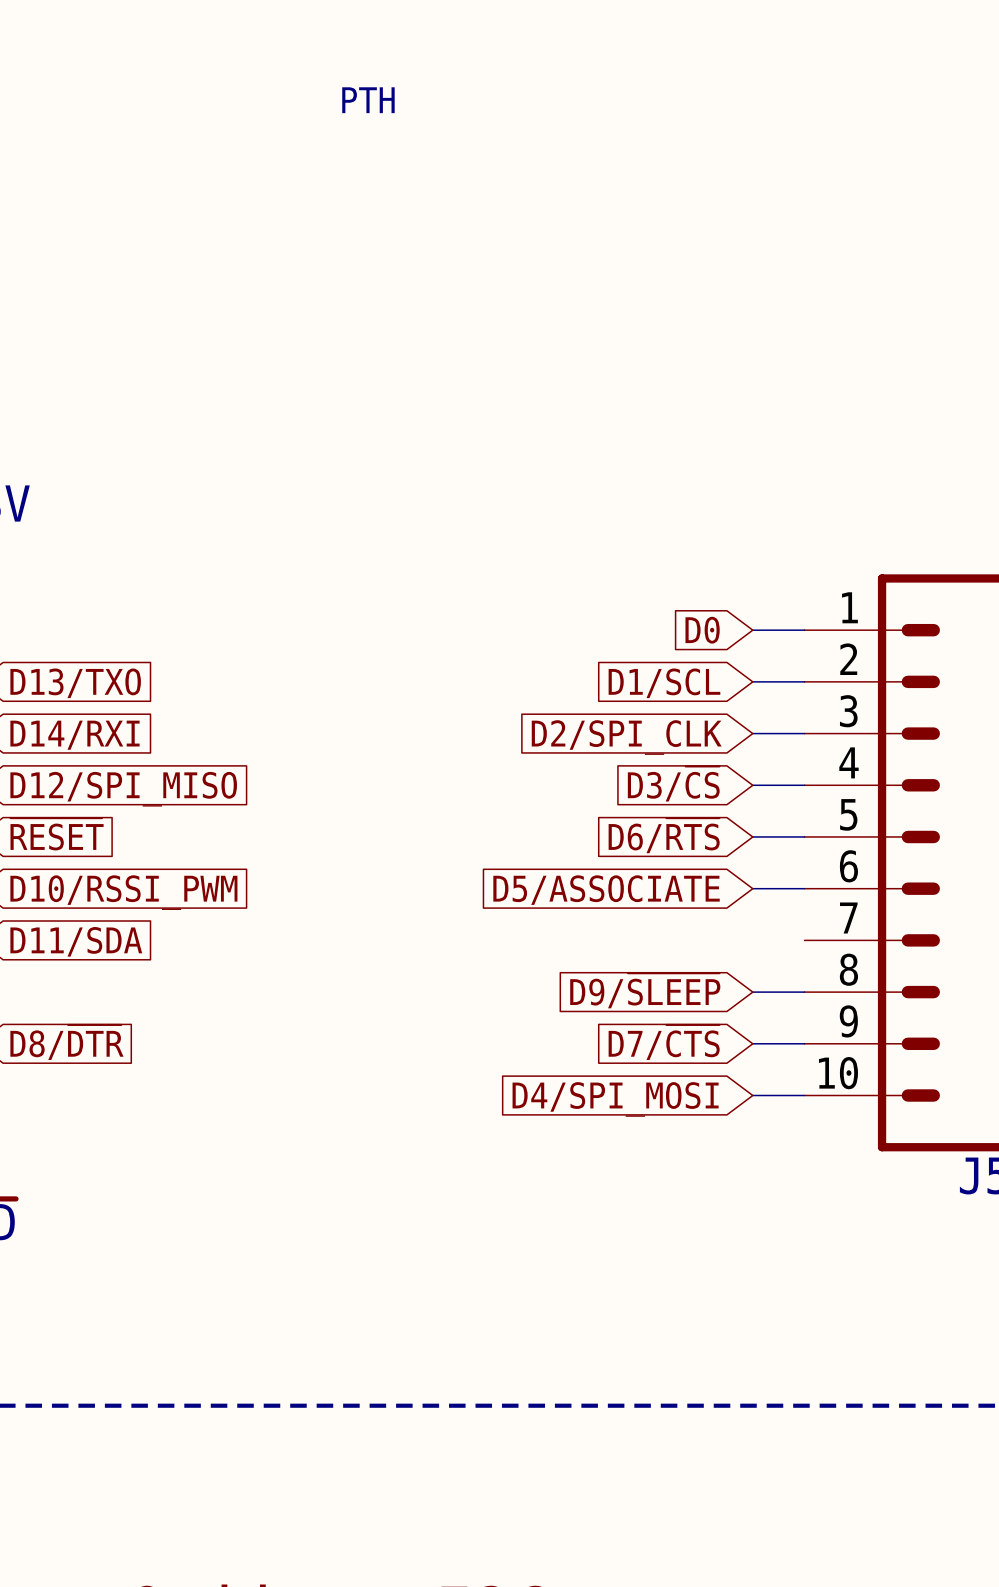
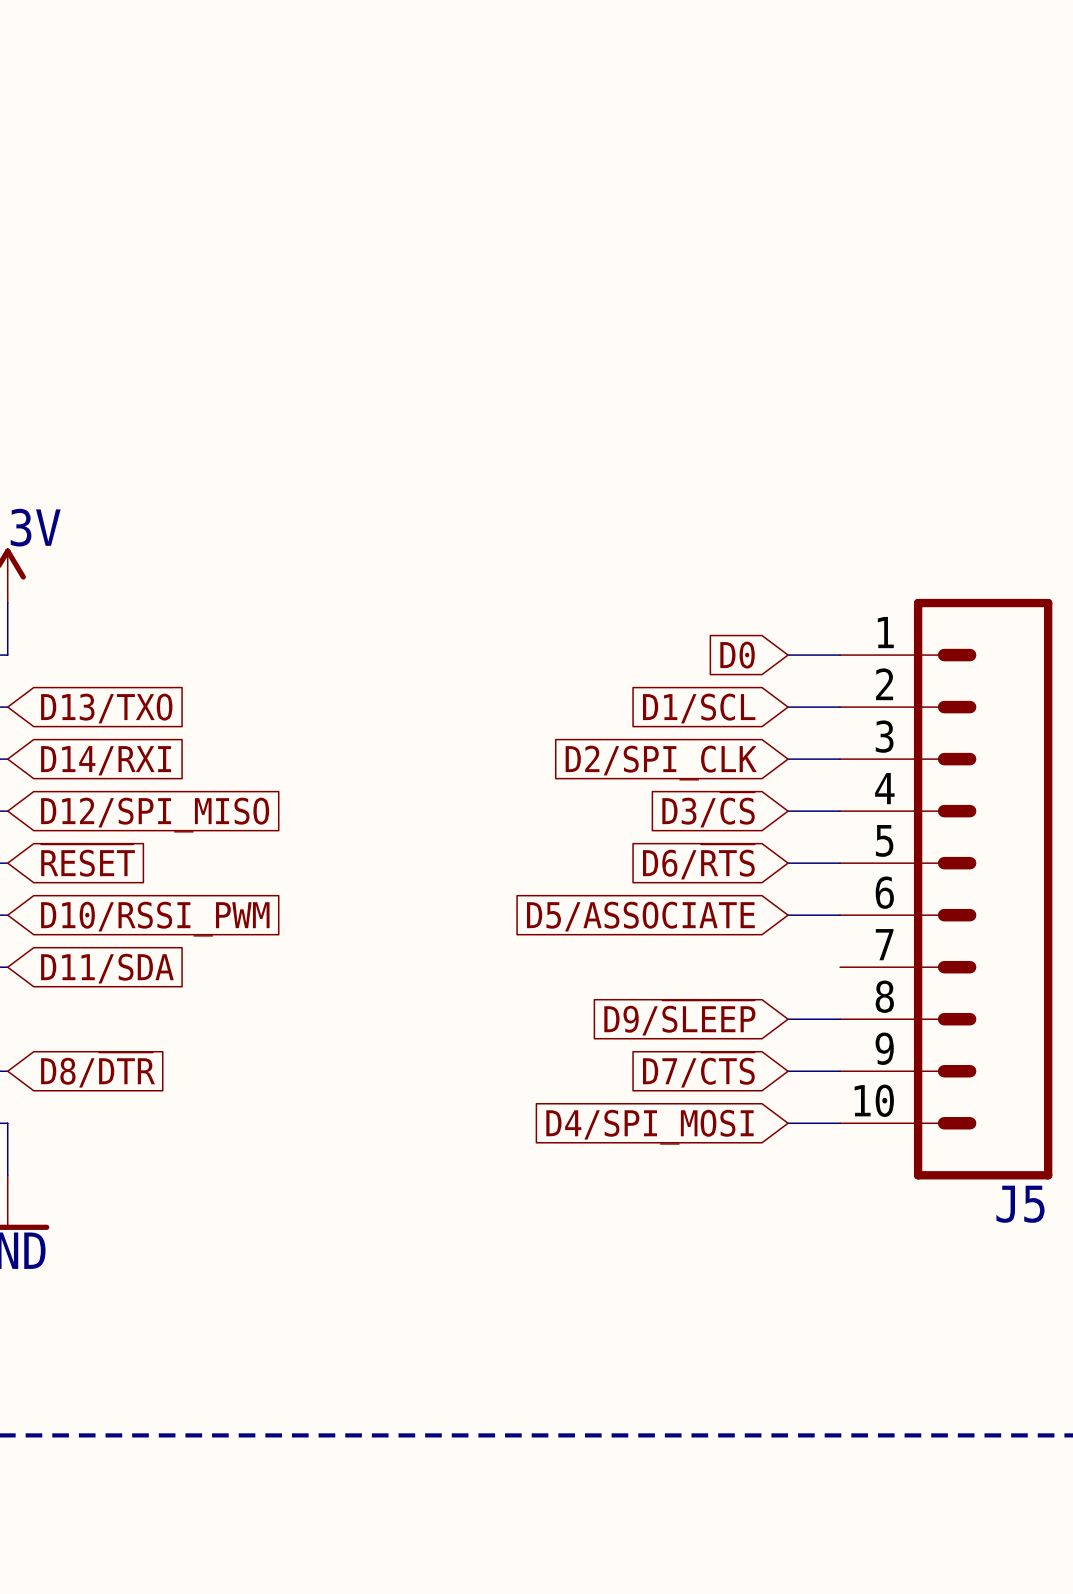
text: PTH (368, 100) -> none

